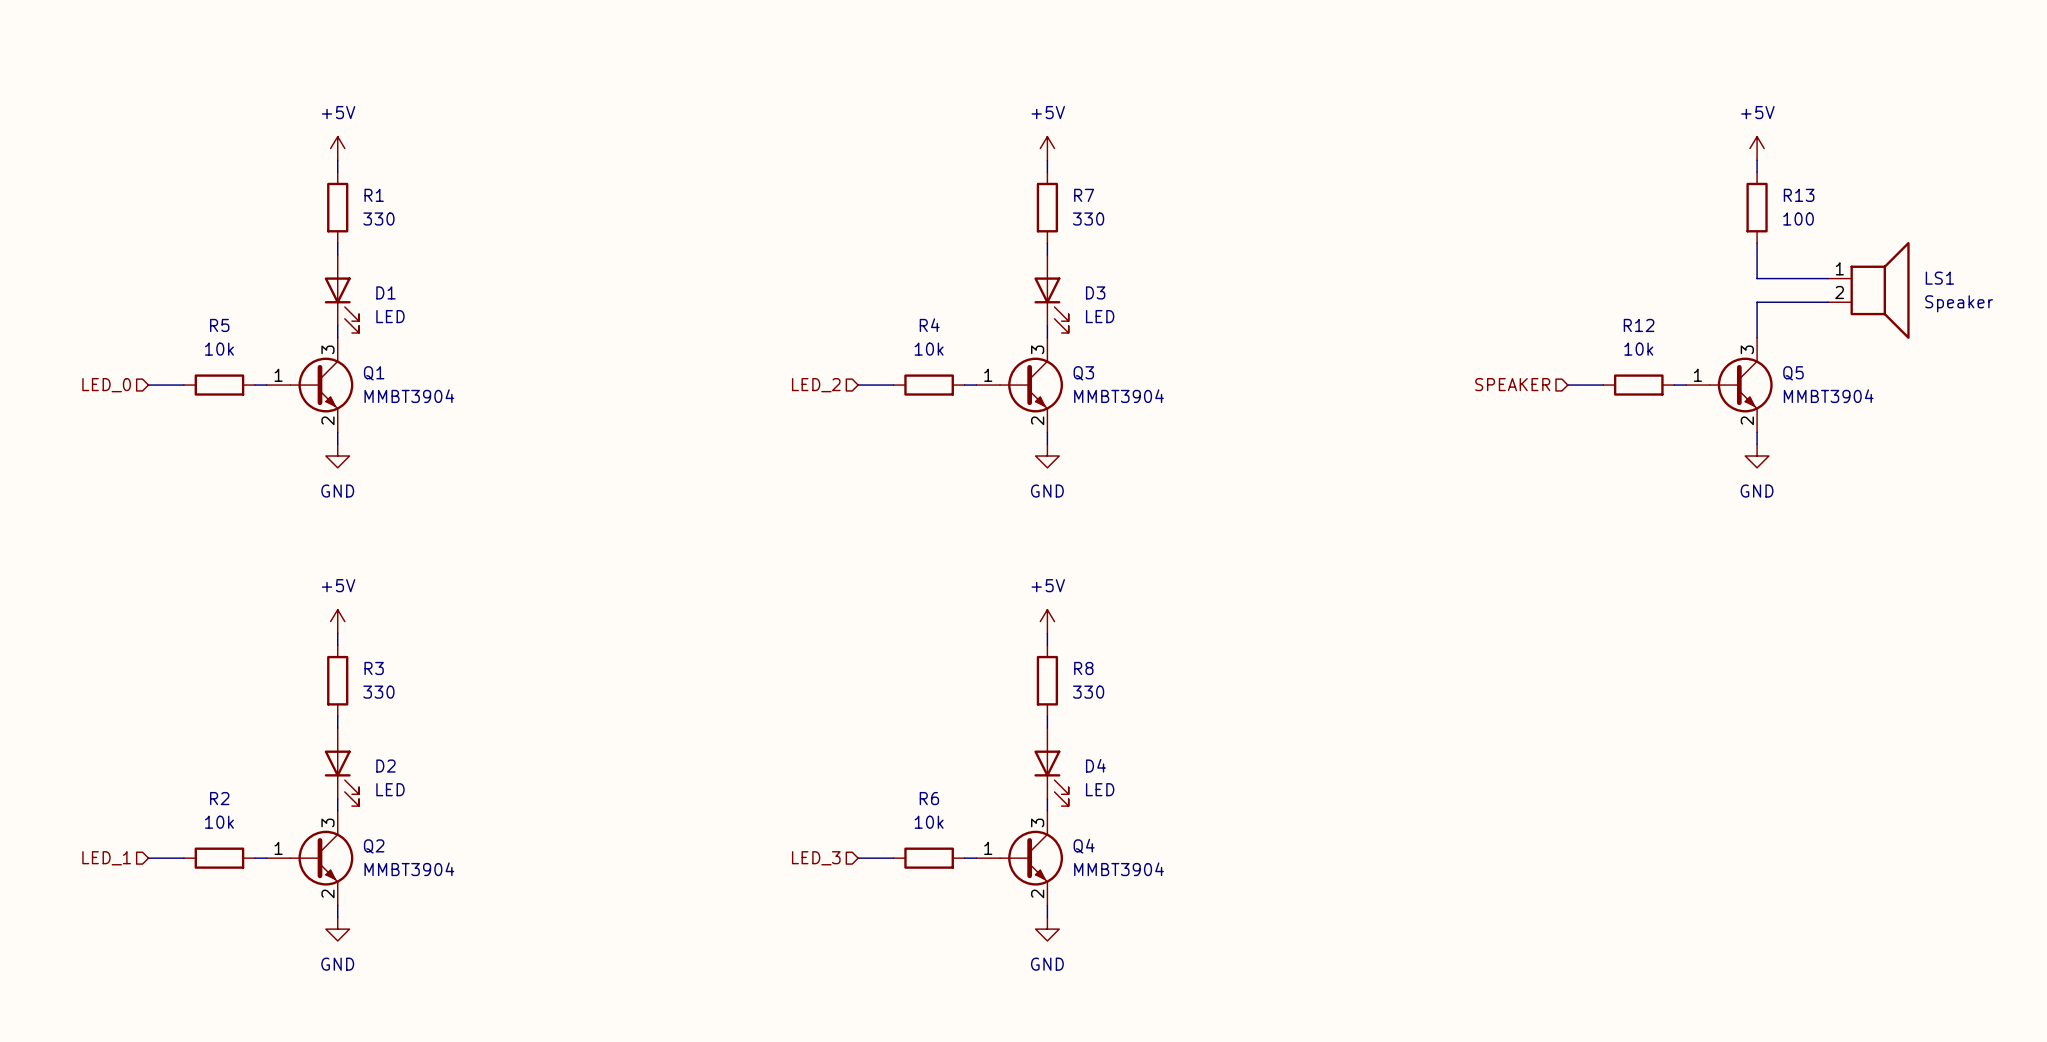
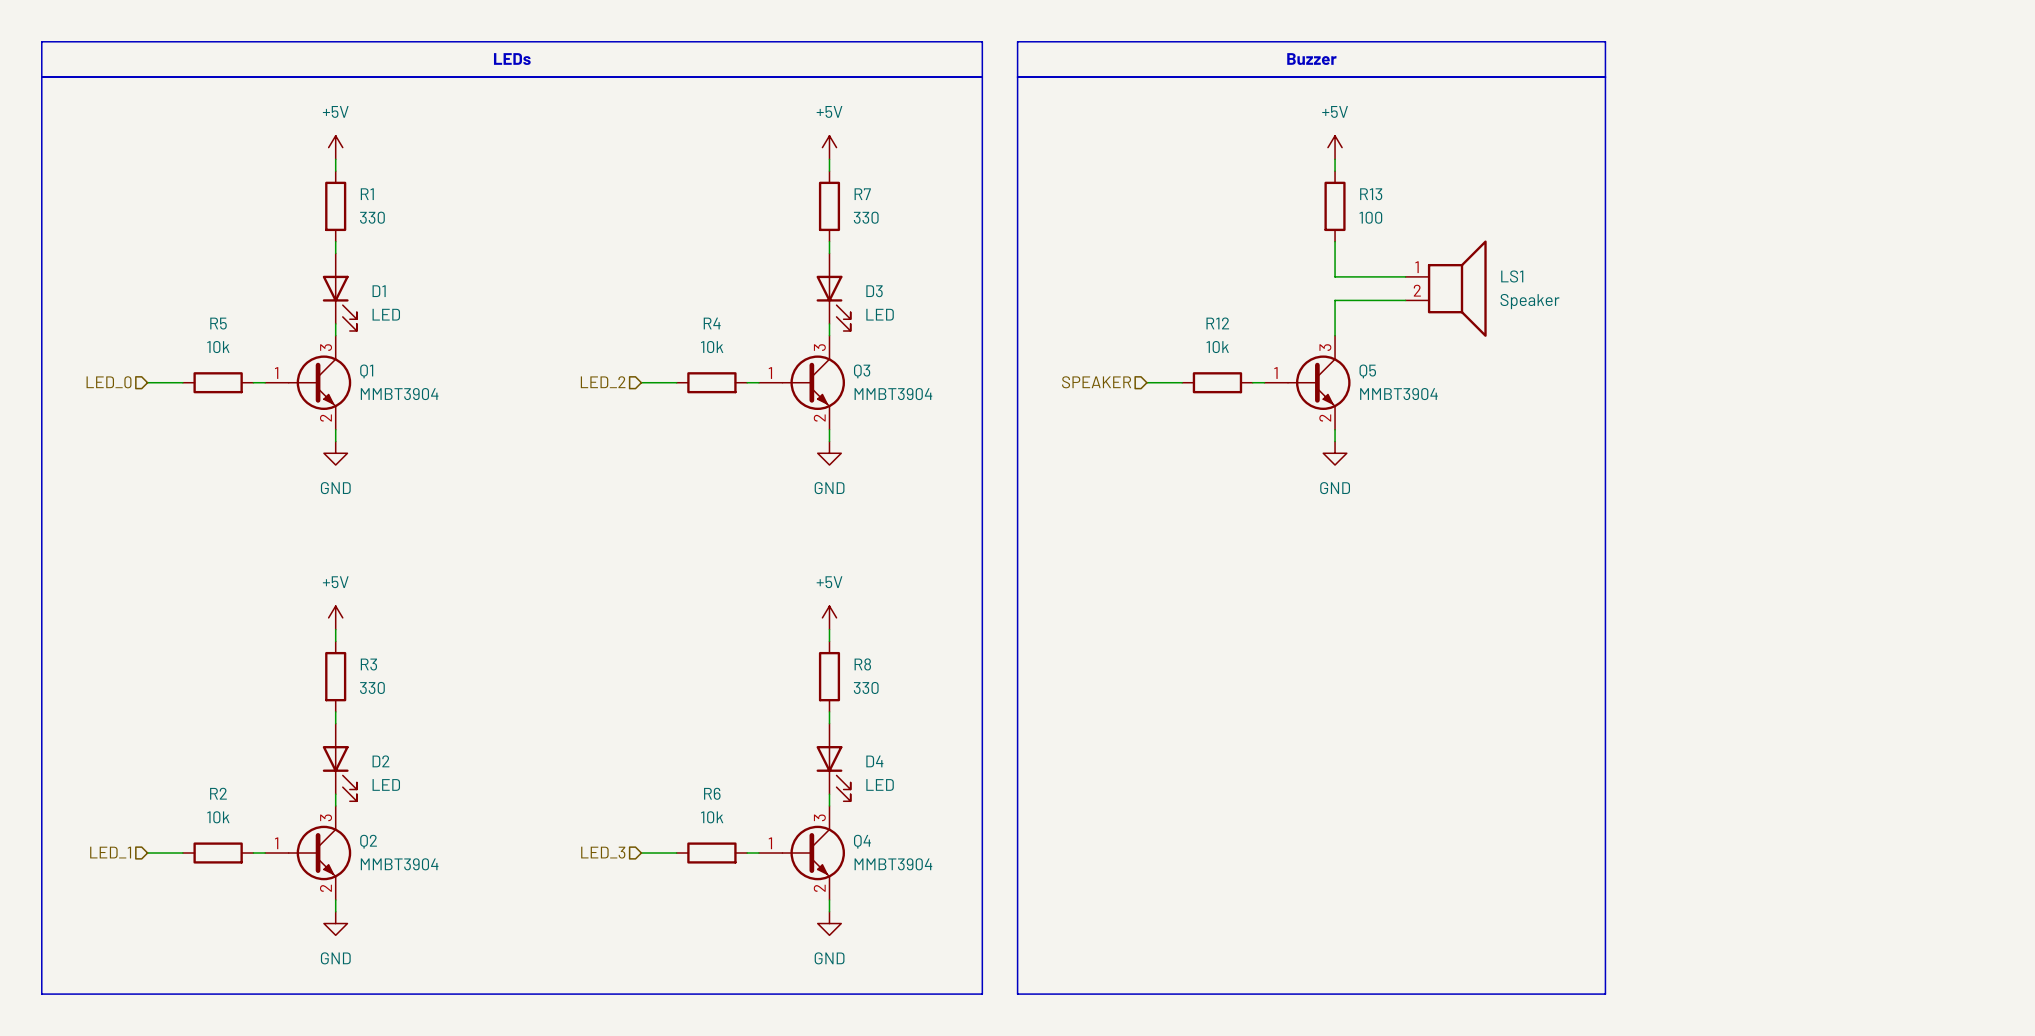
line: none -> (41, 41) (41, 994) (982, 994) (982, 41) (41, 41)
line: none -> (1017, 41) (1017, 994) (1605, 994) (1605, 41) (1017, 41)
text: none -> LEDs (512, 59)
text: none -> Buzzer (1311, 59)
line: none -> (41, 77) (982, 77)
line: none -> (1017, 77) (1605, 77)
power symbol: none -> +5V (829, 147)
power symbol: +5V (1047, 148) -> none
power symbol: none -> +5V (1335, 147)
power symbol: +5V (1757, 148) -> none
wire: (1047, 160) (1047, 172) -> (829, 159) (829, 171)
wire: none -> (1335, 159) (1335, 171)
wire: (1757, 160) (1757, 172) -> none
R7 position: (1047, 207) -> (829, 206)
R13 position: (1757, 207) -> (1335, 206)
wire: (1047, 243) (1047, 254) -> (829, 241) (829, 253)
wire: none -> (1335, 241) (1335, 276) (1405, 276)
wire: (1757, 243) (1757, 278) (1828, 278) -> none
LS1 position: (1868, 290) -> (1446, 288)
D3 position: (1051, 293) -> (833, 292)
wire: none -> (1405, 300) (1335, 300) (1335, 335)
wire: (1828, 302) (1757, 302) (1757, 337) -> none
wire: (1047, 325) (1047, 337) -> (829, 323) (829, 335)
hierarchical label: none -> SPEAKER (1096, 382)
hierarchical label: SPEAKER (1512, 384) -> none
hierarchical label position: LED_2 (816, 385) -> LED_2 (603, 382)
wire: (858, 385) (893, 385) -> (641, 382) (676, 382)
R4 position: (929, 385) -> (711, 382)
wire: (964, 385) (976, 385) -> (747, 382) (758, 382)
Q3 position: (1019, 385) -> (801, 382)
wire: none -> (1146, 382) (1182, 382)
wire: none -> (1252, 382) (1264, 382)
wire: (1567, 385) (1603, 385) -> none
R12 position: (1638, 385) -> (1217, 382)
wire: (1674, 385) (1686, 385) -> none
Q5 position: (1729, 385) -> (1307, 382)
wire: (1047, 432) (1047, 444) -> (829, 429) (829, 441)
wire: none -> (1335, 429) (1335, 441)
wire: (1757, 432) (1757, 444) -> none
power symbol: none -> GND (829, 453)
power symbol: GND (1047, 456) -> none
power symbol: none -> GND (1335, 453)
power symbol: GND (1757, 456) -> none
power symbol position: +5V (1047, 621) -> +5V (829, 617)
wire: (1047, 633) (1047, 645) -> (829, 629) (829, 641)
R8 position: (1047, 680) -> (829, 676)
wire: (1047, 716) (1047, 728) -> (829, 711) (829, 723)
D4 position: (1051, 767) -> (833, 762)
wire: (1047, 799) (1047, 810) -> (829, 794) (829, 805)
hierarchical label position: LED_3 (816, 858) -> LED_3 (603, 852)
wire: (858, 858) (893, 858) -> (641, 853) (676, 853)
R6 position: (929, 858) -> (711, 853)
wire: (964, 858) (976, 858) -> (747, 853) (758, 853)
Q4 position: (1019, 858) -> (801, 853)
wire: (1047, 905) (1047, 917) -> (829, 900) (829, 911)
power symbol position: GND (1047, 929) -> GND (829, 923)

